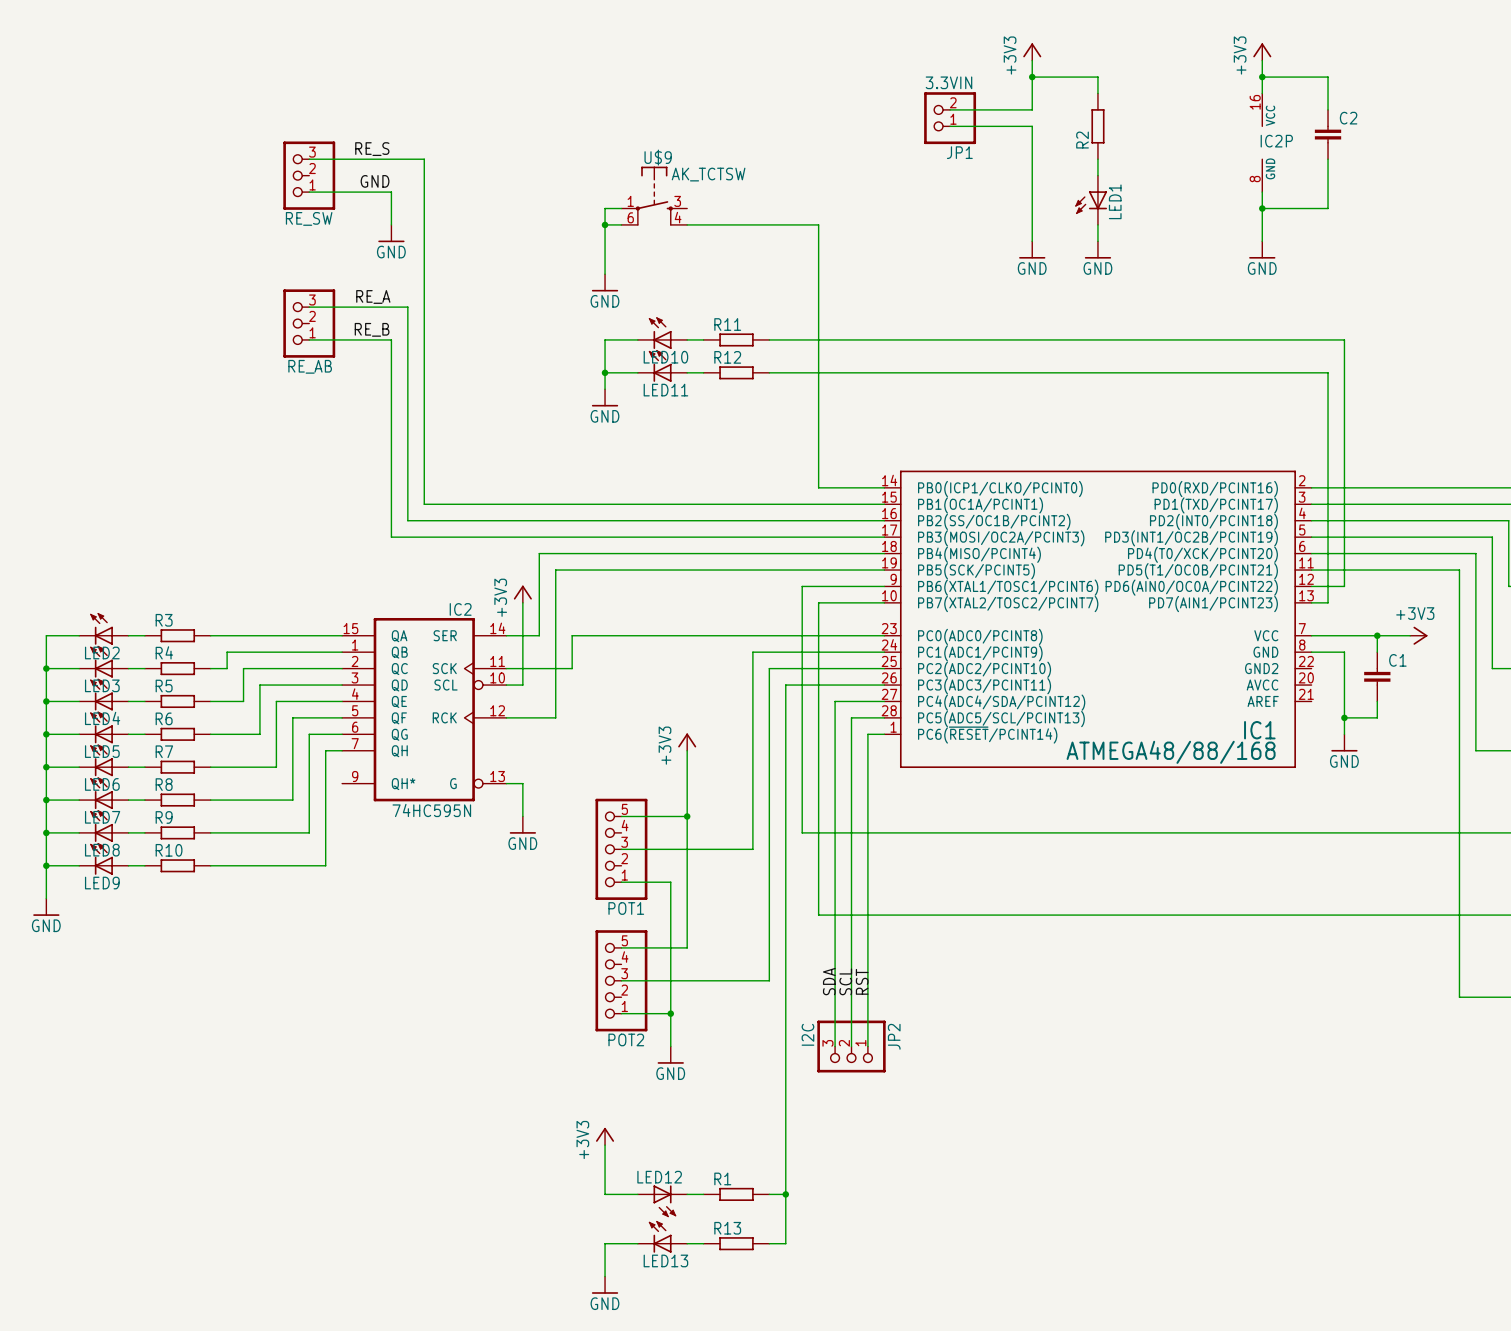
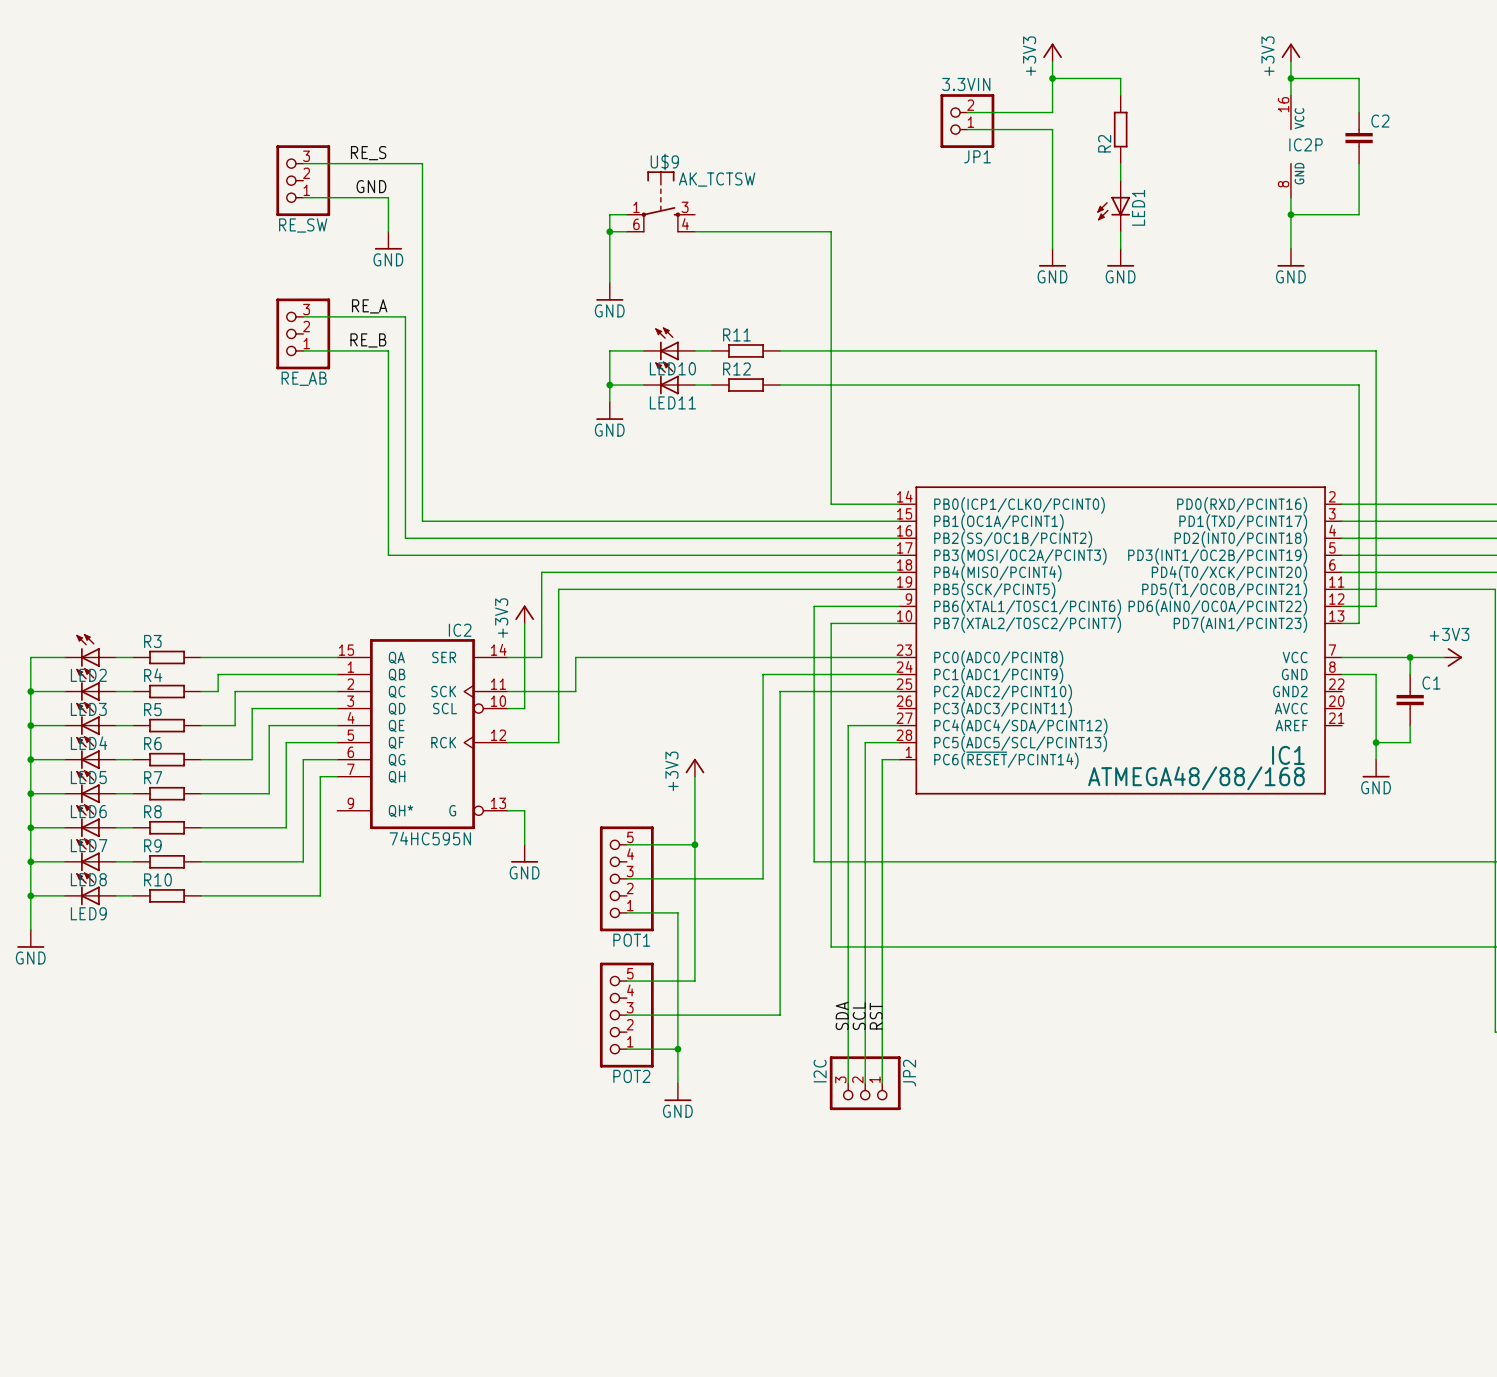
wire: (884, 685) (785, 685) (785, 1243) (769, 1243) -> none
power symbol: +3V3 (605, 1136) -> none
wire: (605, 1145) (605, 1194) (637, 1194) -> none
wire: (687, 1194) (703, 1194) -> none
R1: (736, 1194) -> none
wire: (769, 1194) (785, 1194) -> none
junction: (785, 1194) -> none
LED12: (662, 1201) -> none
LED13: (662, 1236) -> none
wire: (637, 1243) (605, 1243) (605, 1276) -> none
wire: (687, 1243) (703, 1243) -> none
R13: (736, 1243) -> none
power symbol: GND (605, 1285) -> none

